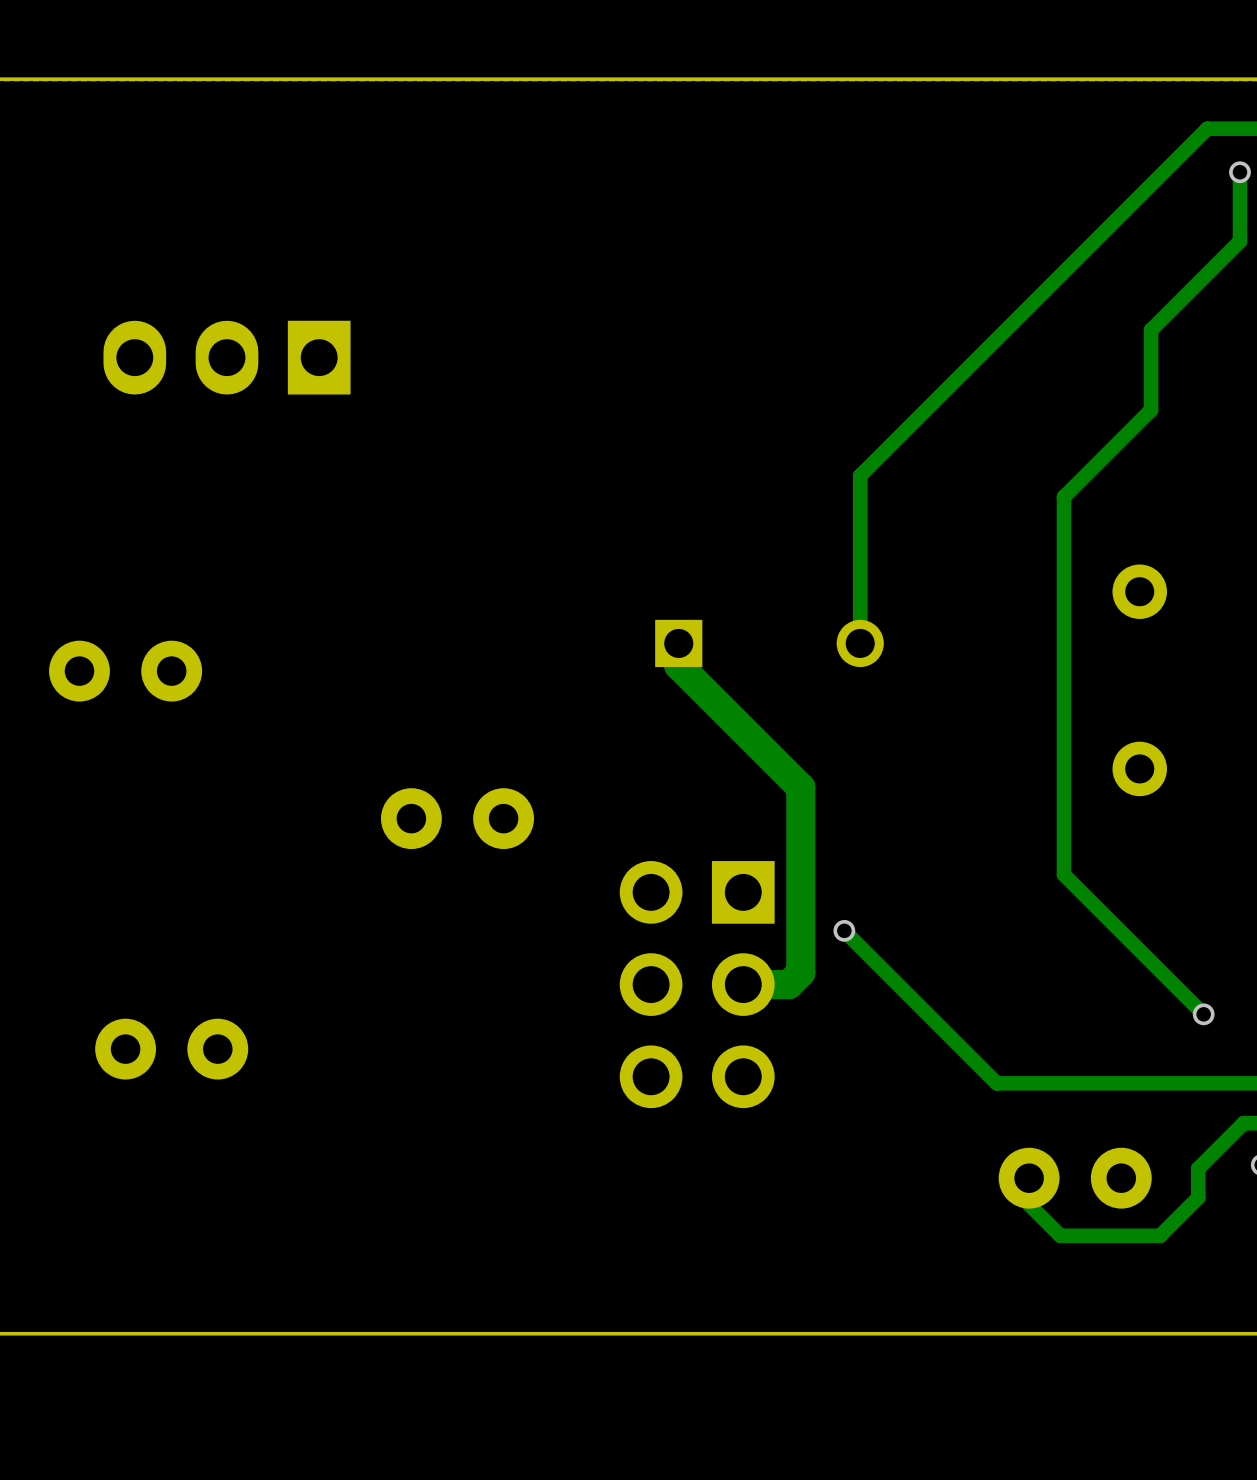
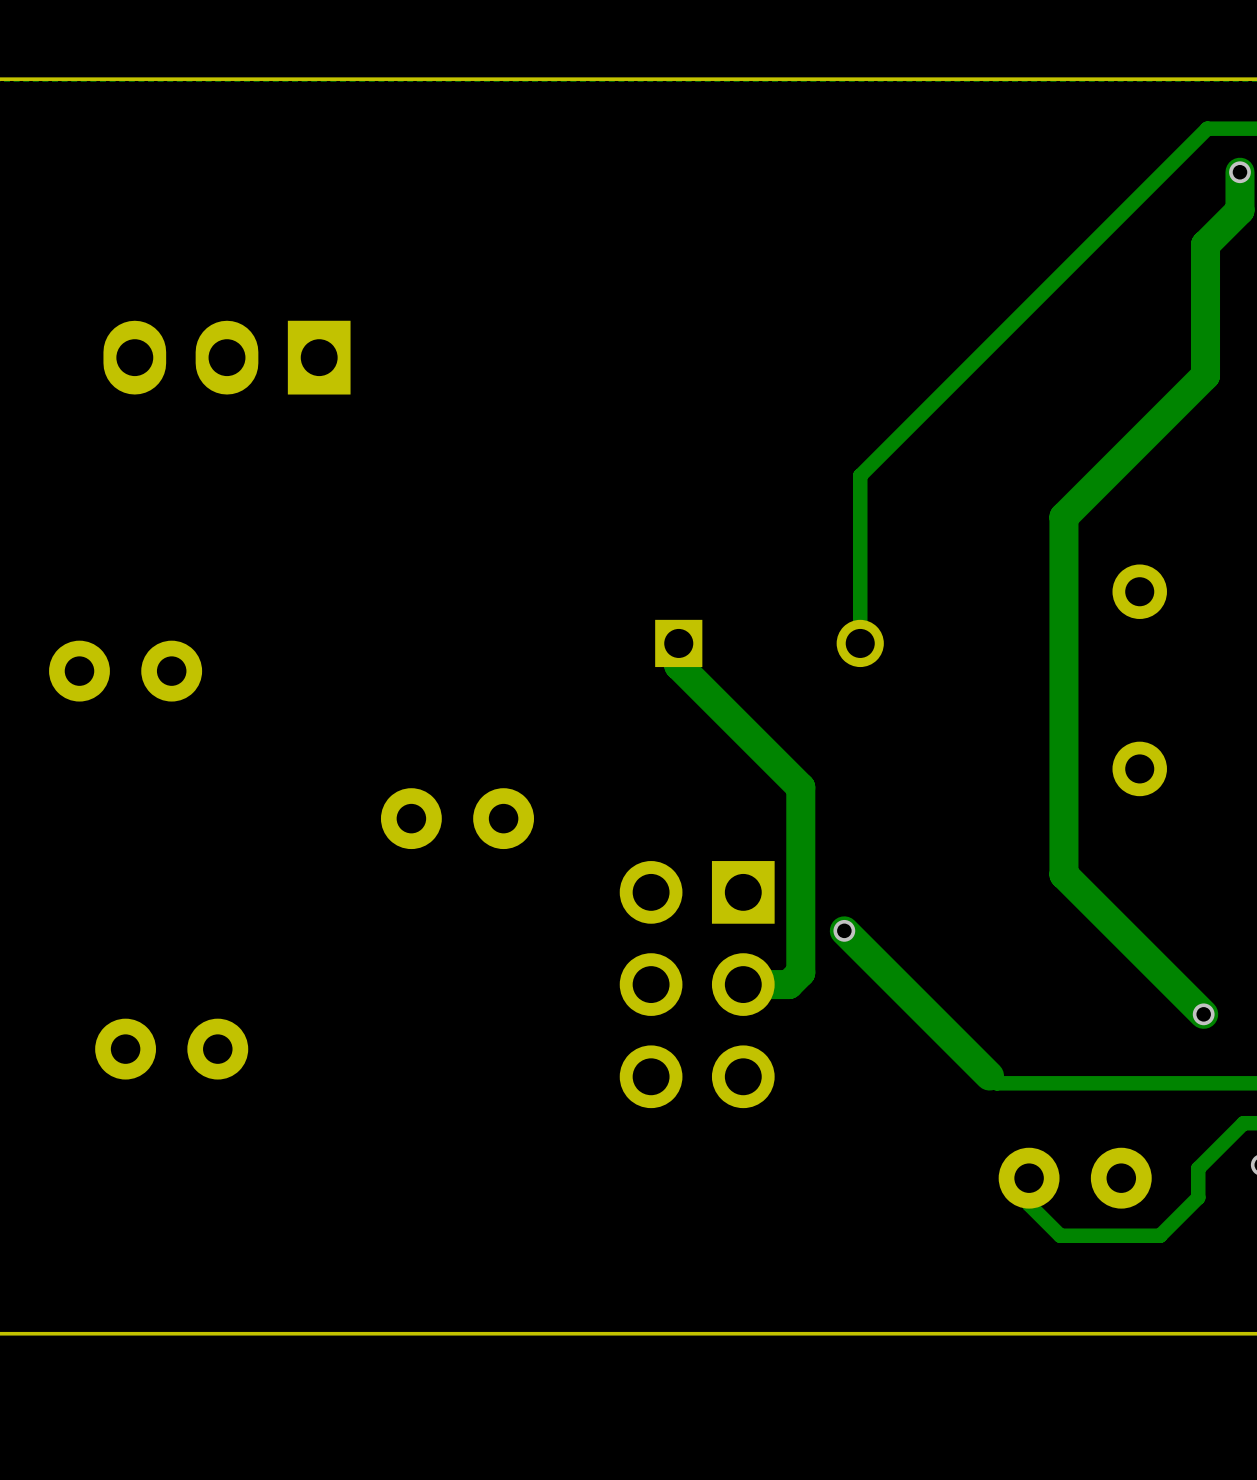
track width: thin (1239, 172) (1239, 210) -> thick (1239, 172) (1239, 210)
track: (1239, 210) (1239, 241) (1151, 330) (1151, 409) (1063, 497) (1063, 517) -> (1239, 210) (1205, 244) (1205, 375) (1063, 517)
track width: thin (1063, 517) (1063, 874) (1203, 1014) -> thick (1063, 517) (1063, 874) (1203, 1014)
track width: thin (844, 930) (989, 1076) -> thick (844, 930) (989, 1076)

